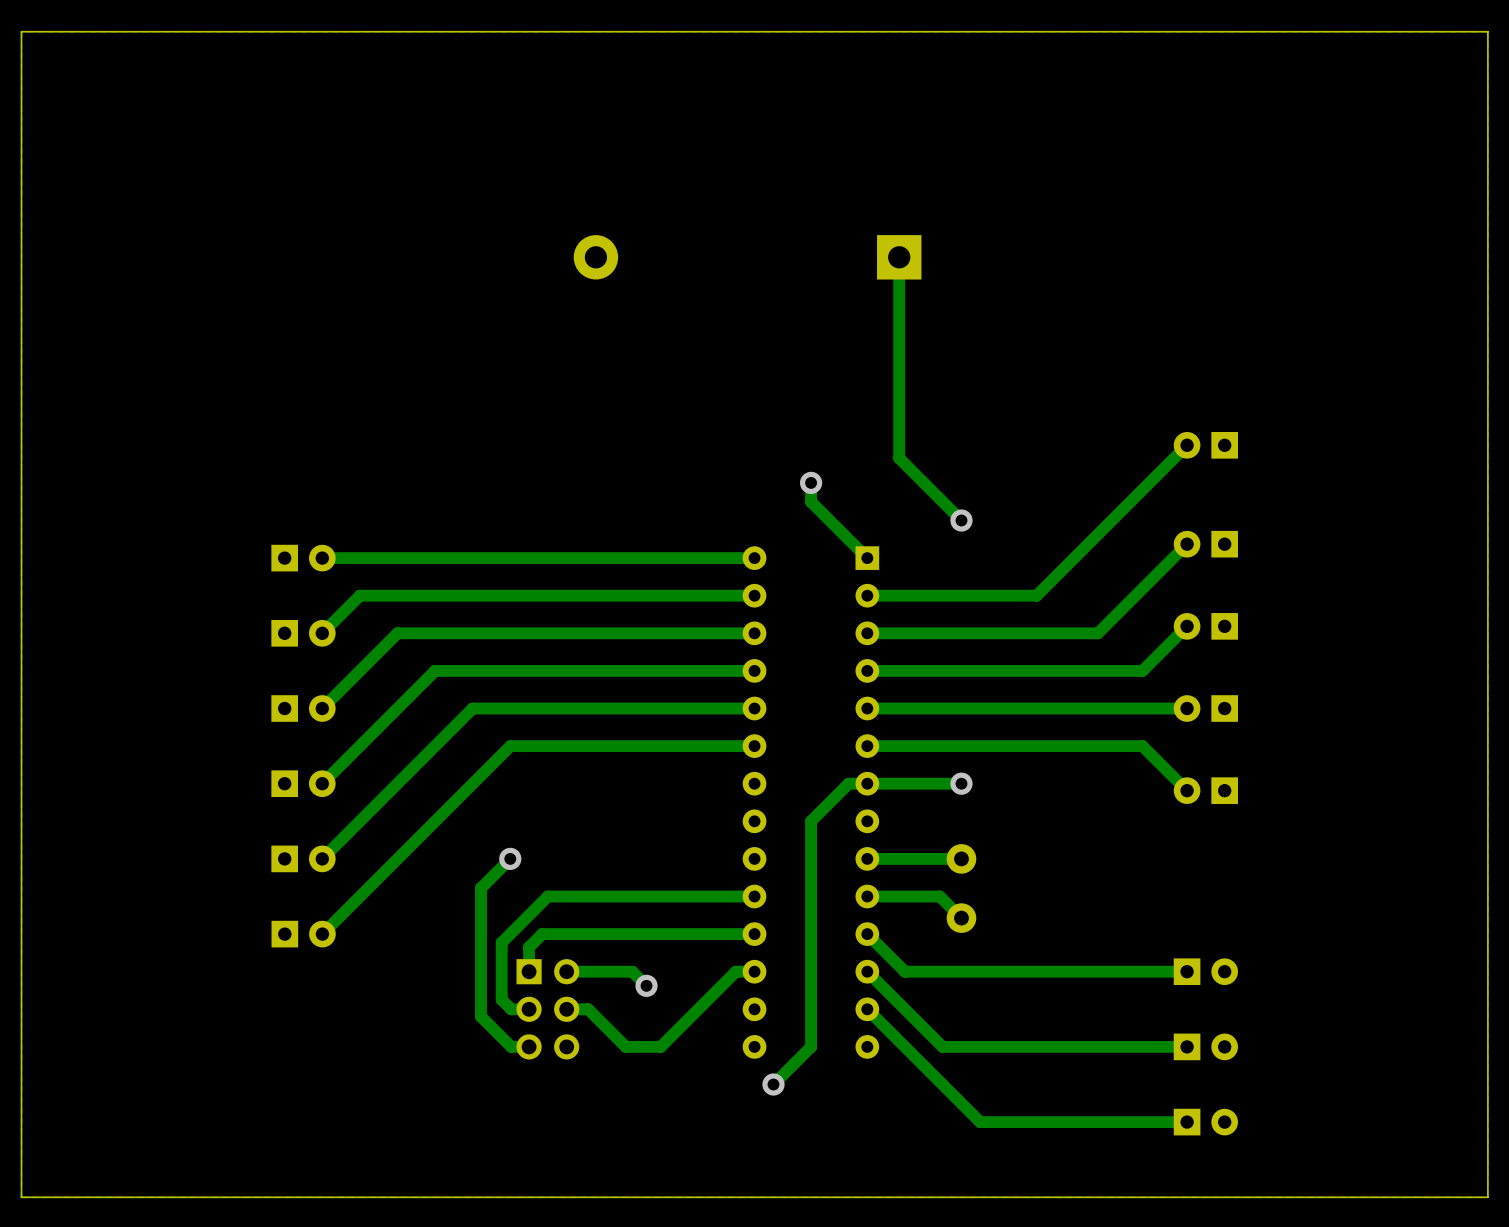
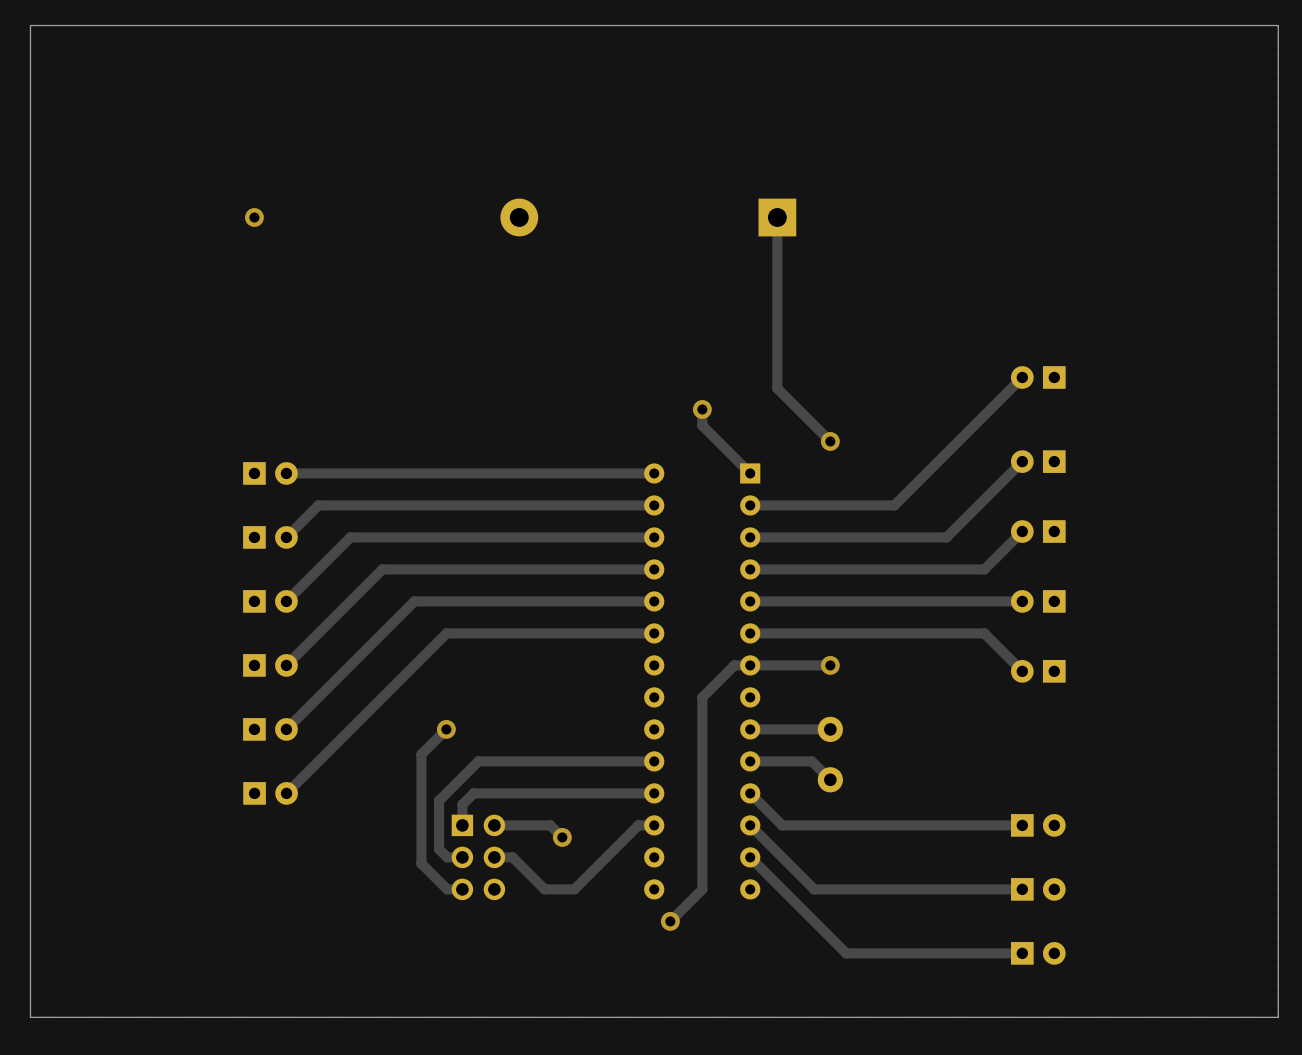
via: none -> (254, 217)

